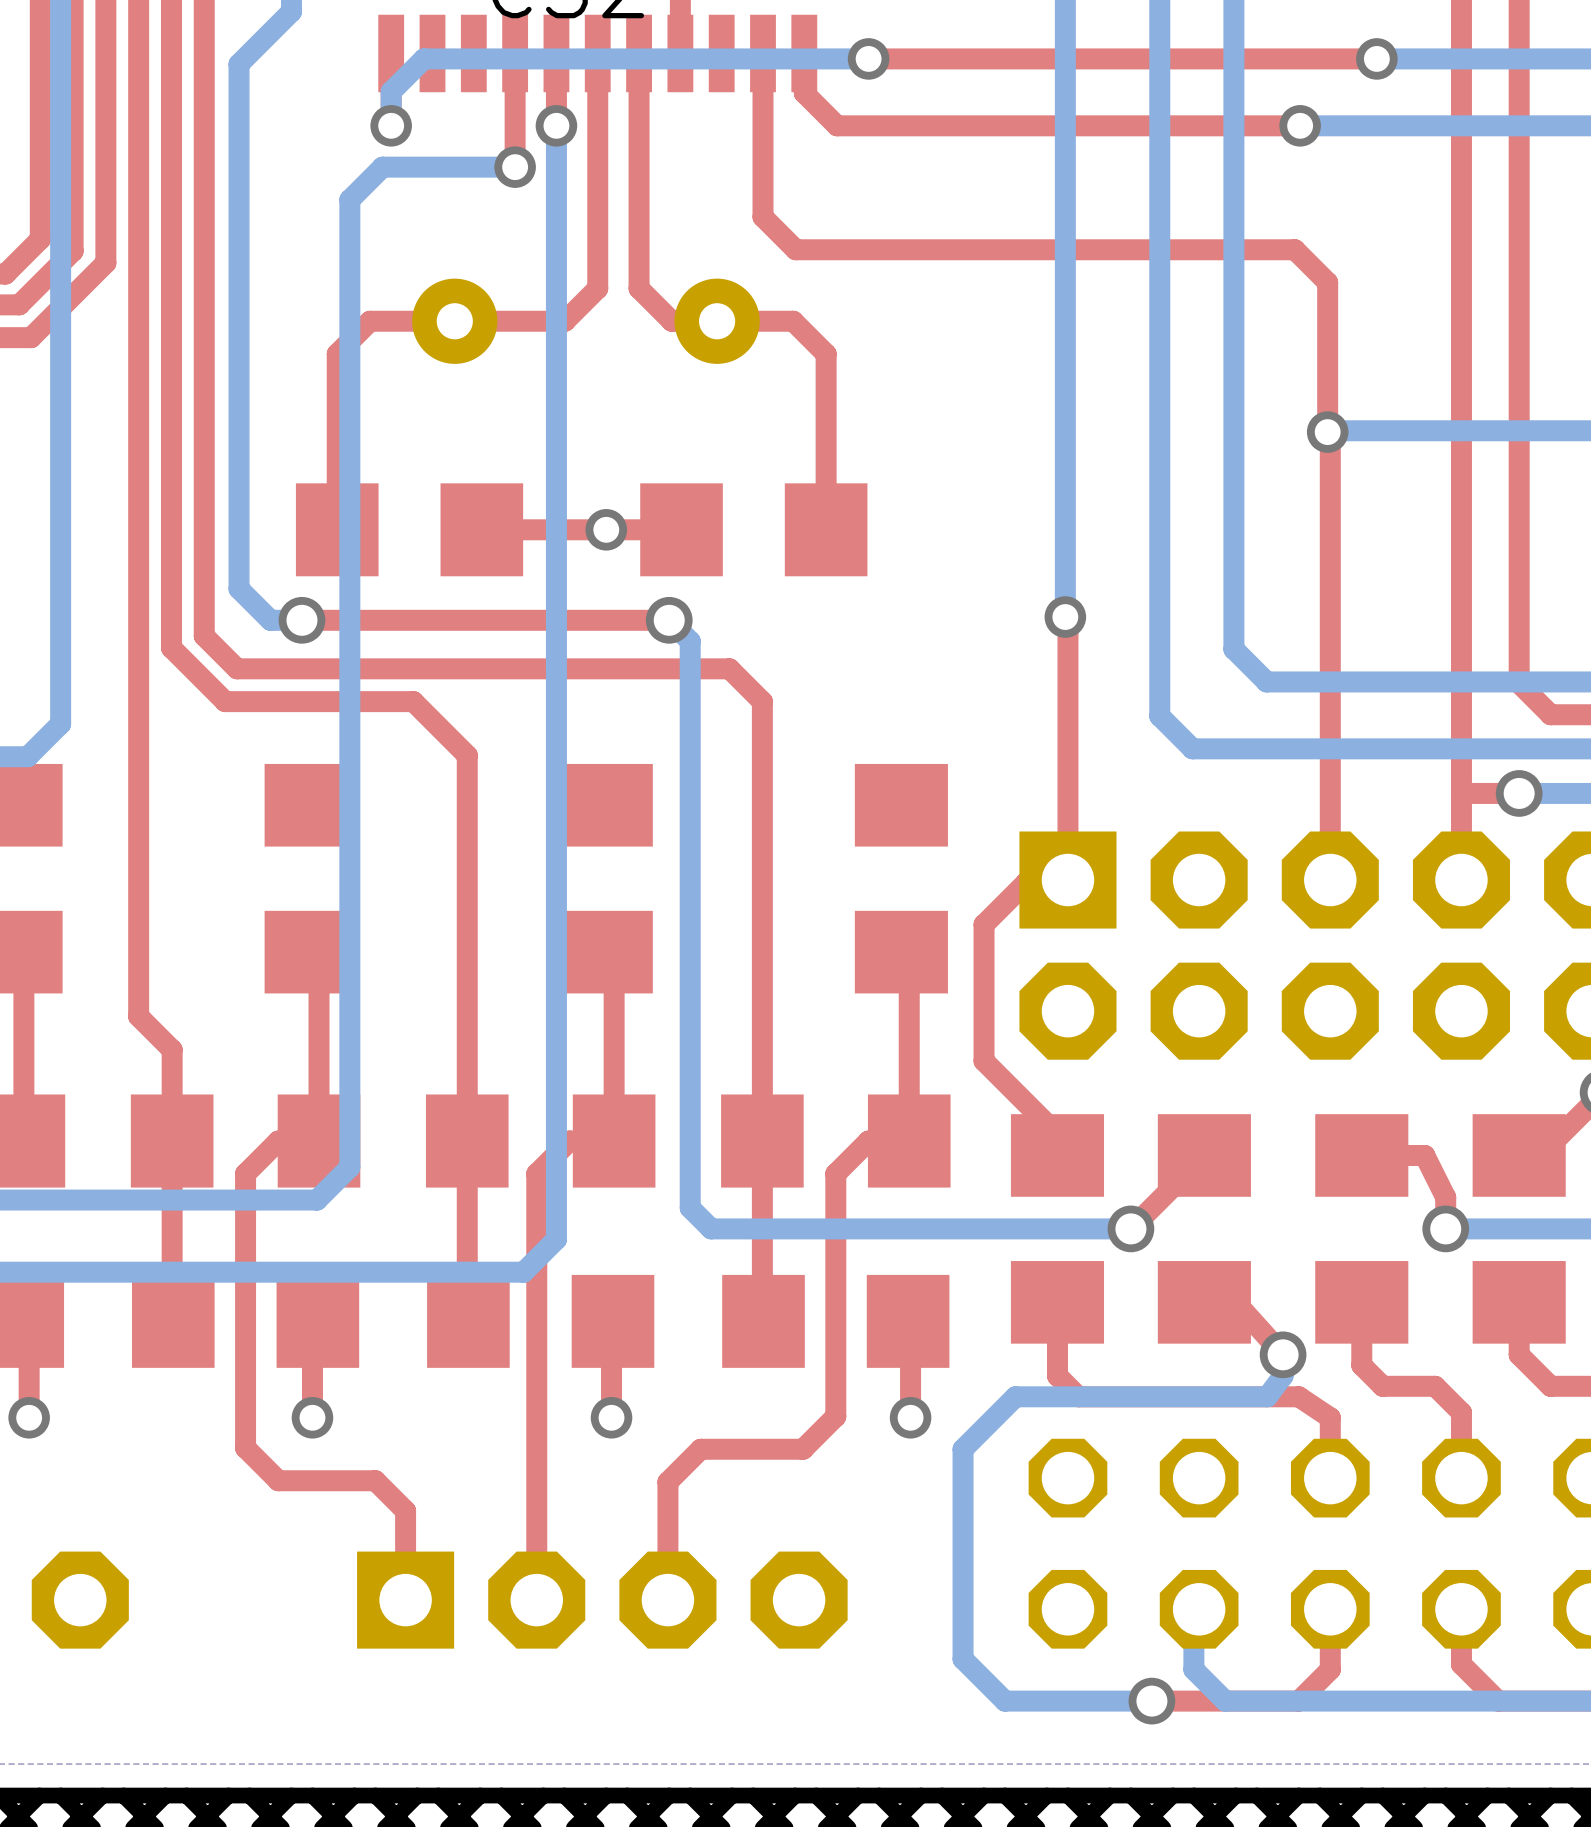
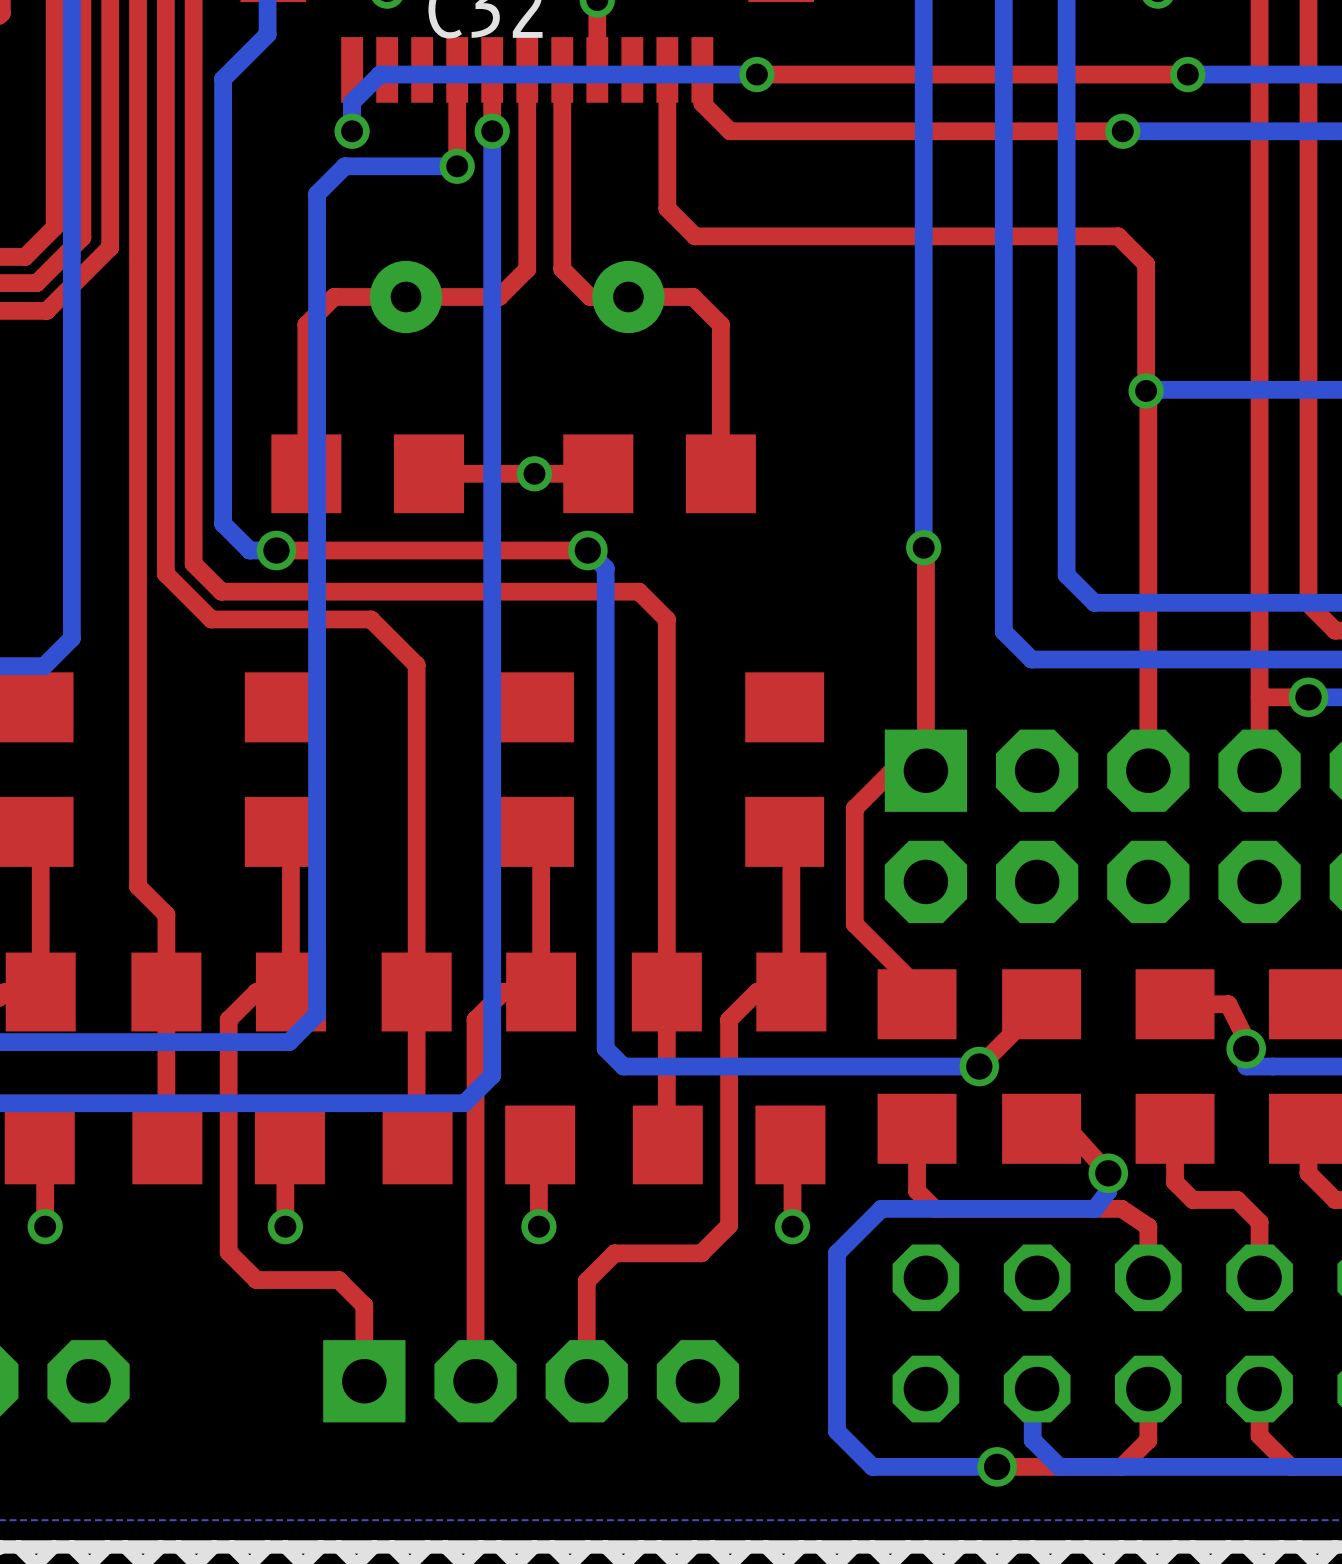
via position: (1445, 1228) -> (1246, 1048)

